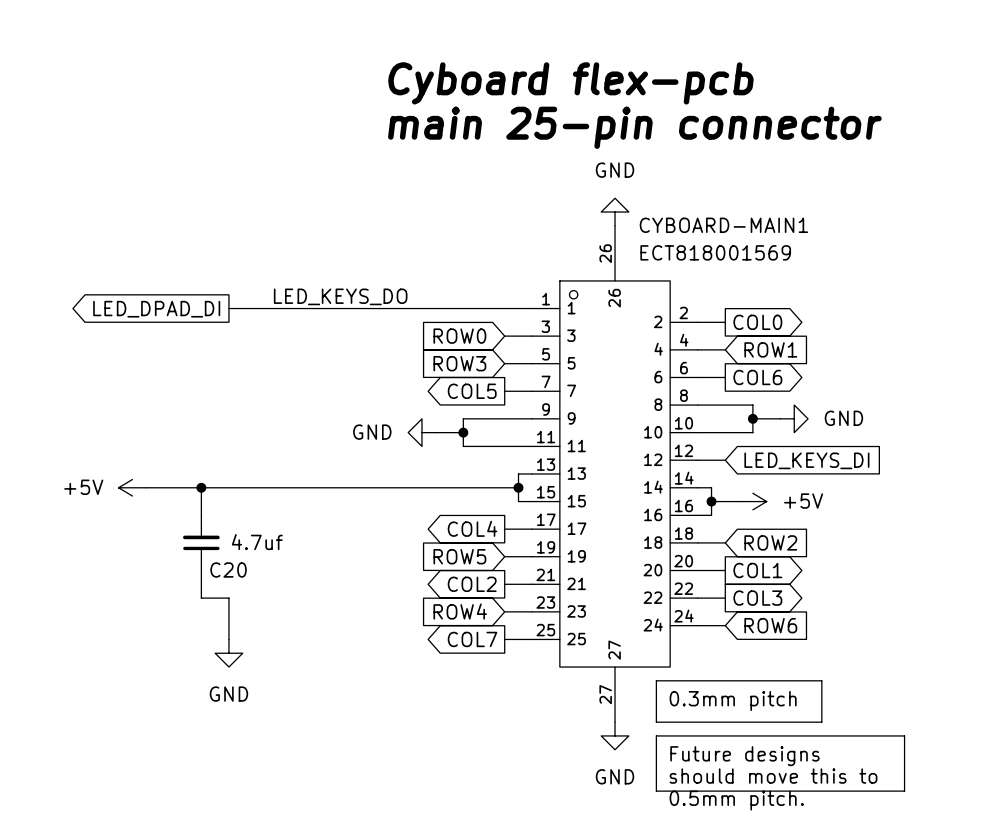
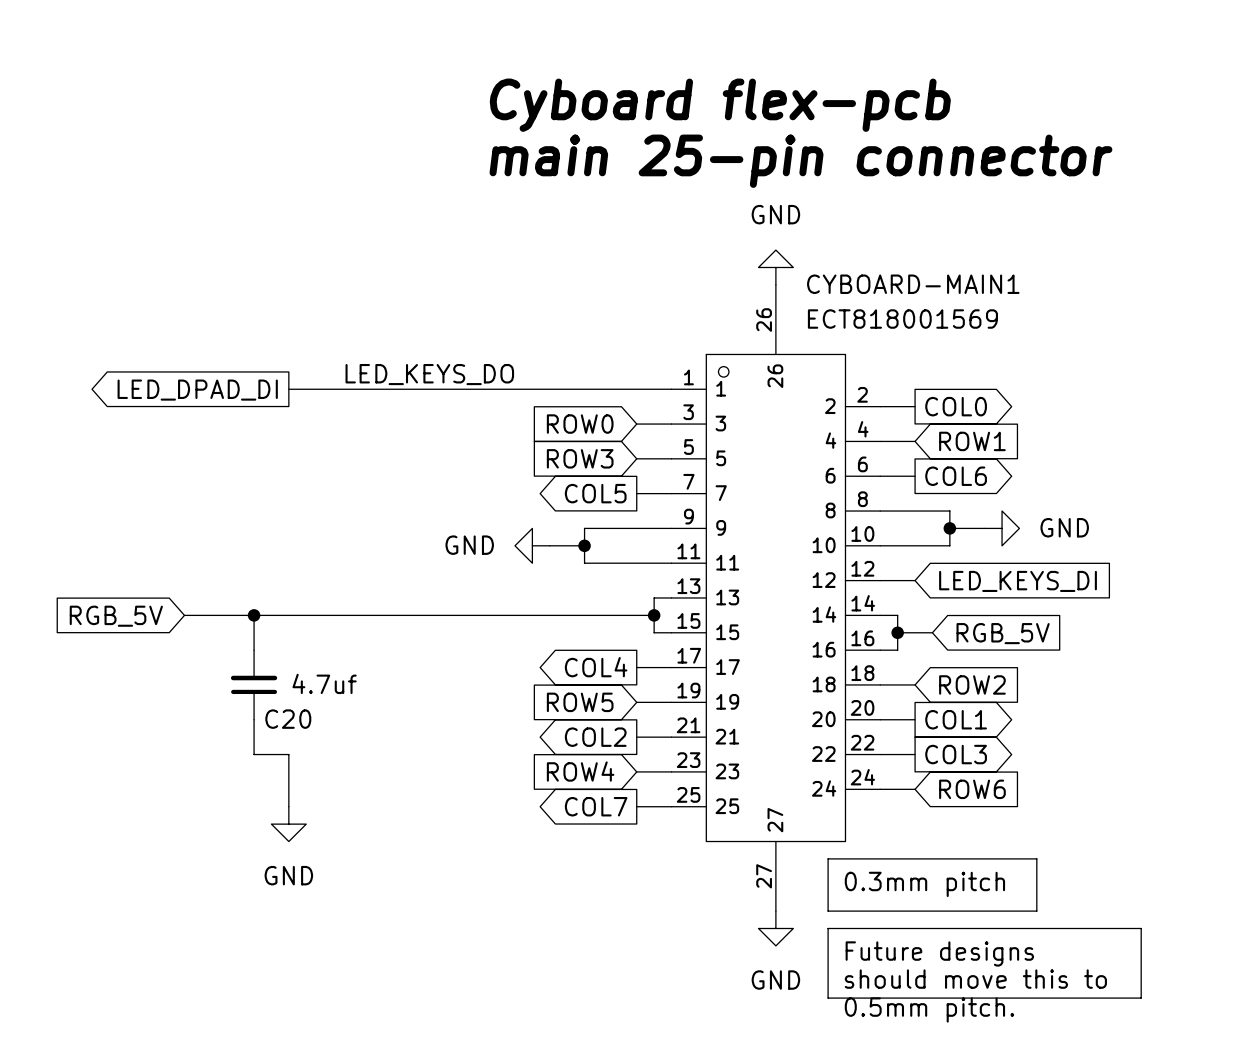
power symbol: +5V (132, 487) -> none
global label: none -> RGB_5V (116, 616)
power symbol: +5V (752, 501) -> none
global label: none -> RGB_5V (1003, 633)

